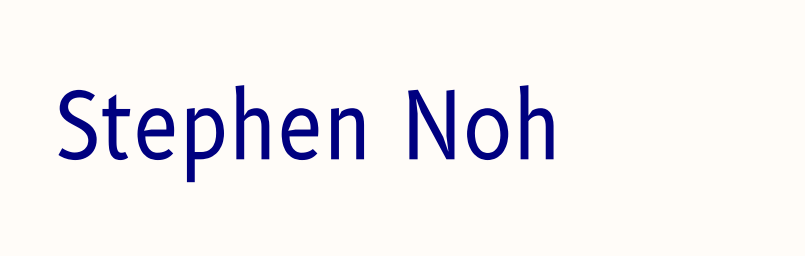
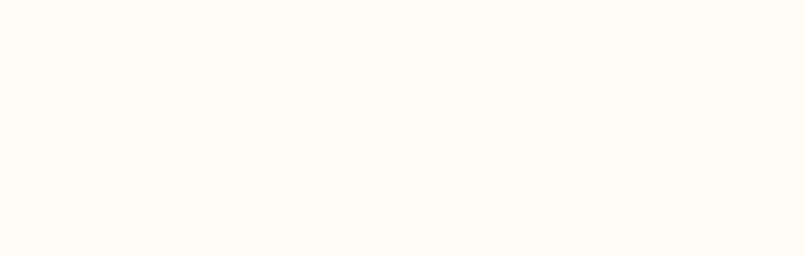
text: Stephen Noh (306, 133) -> none

